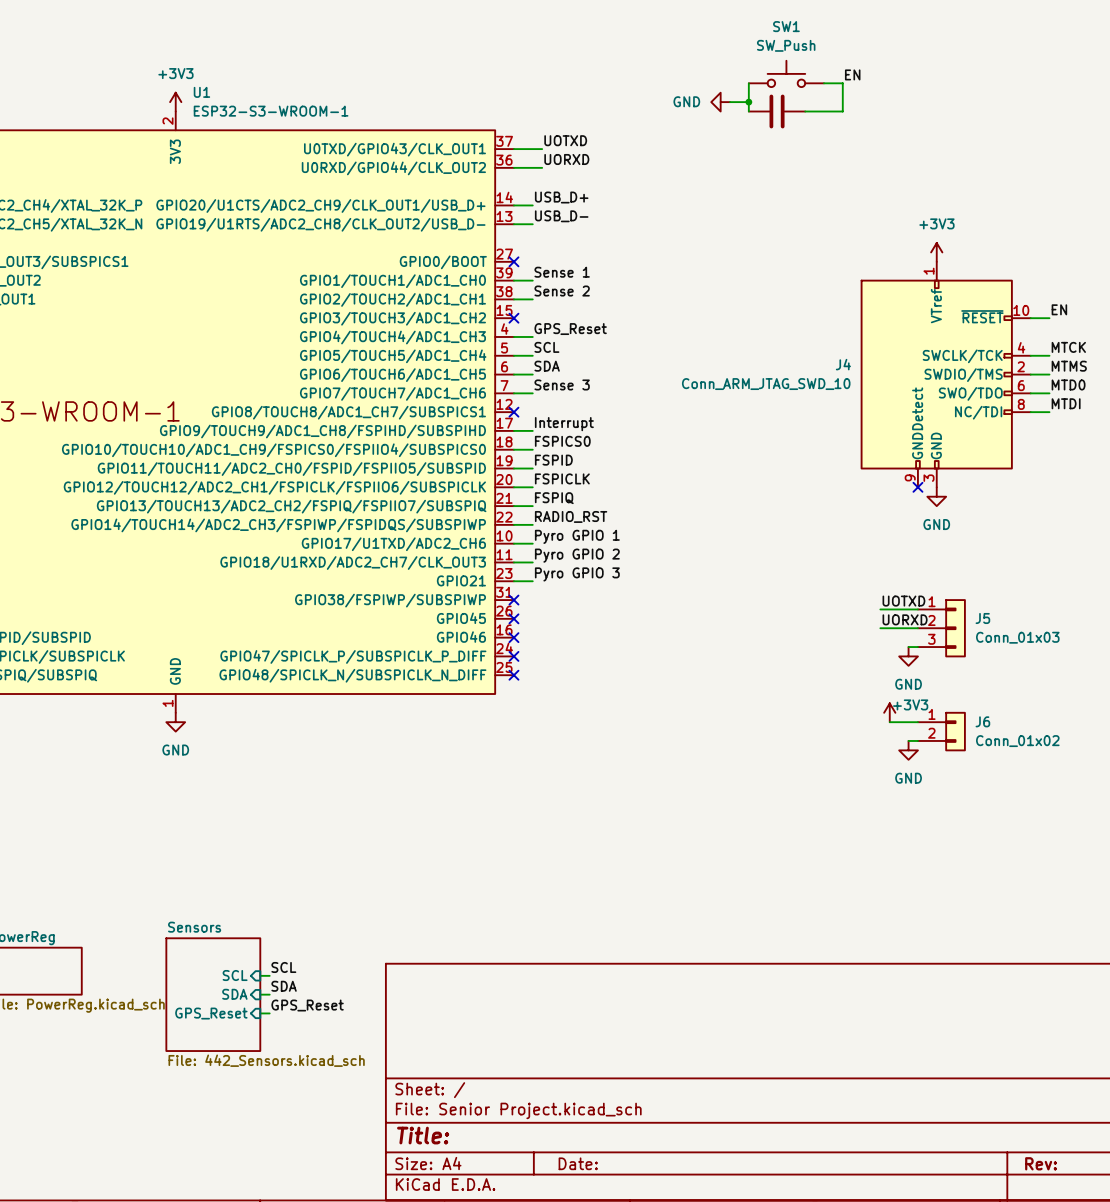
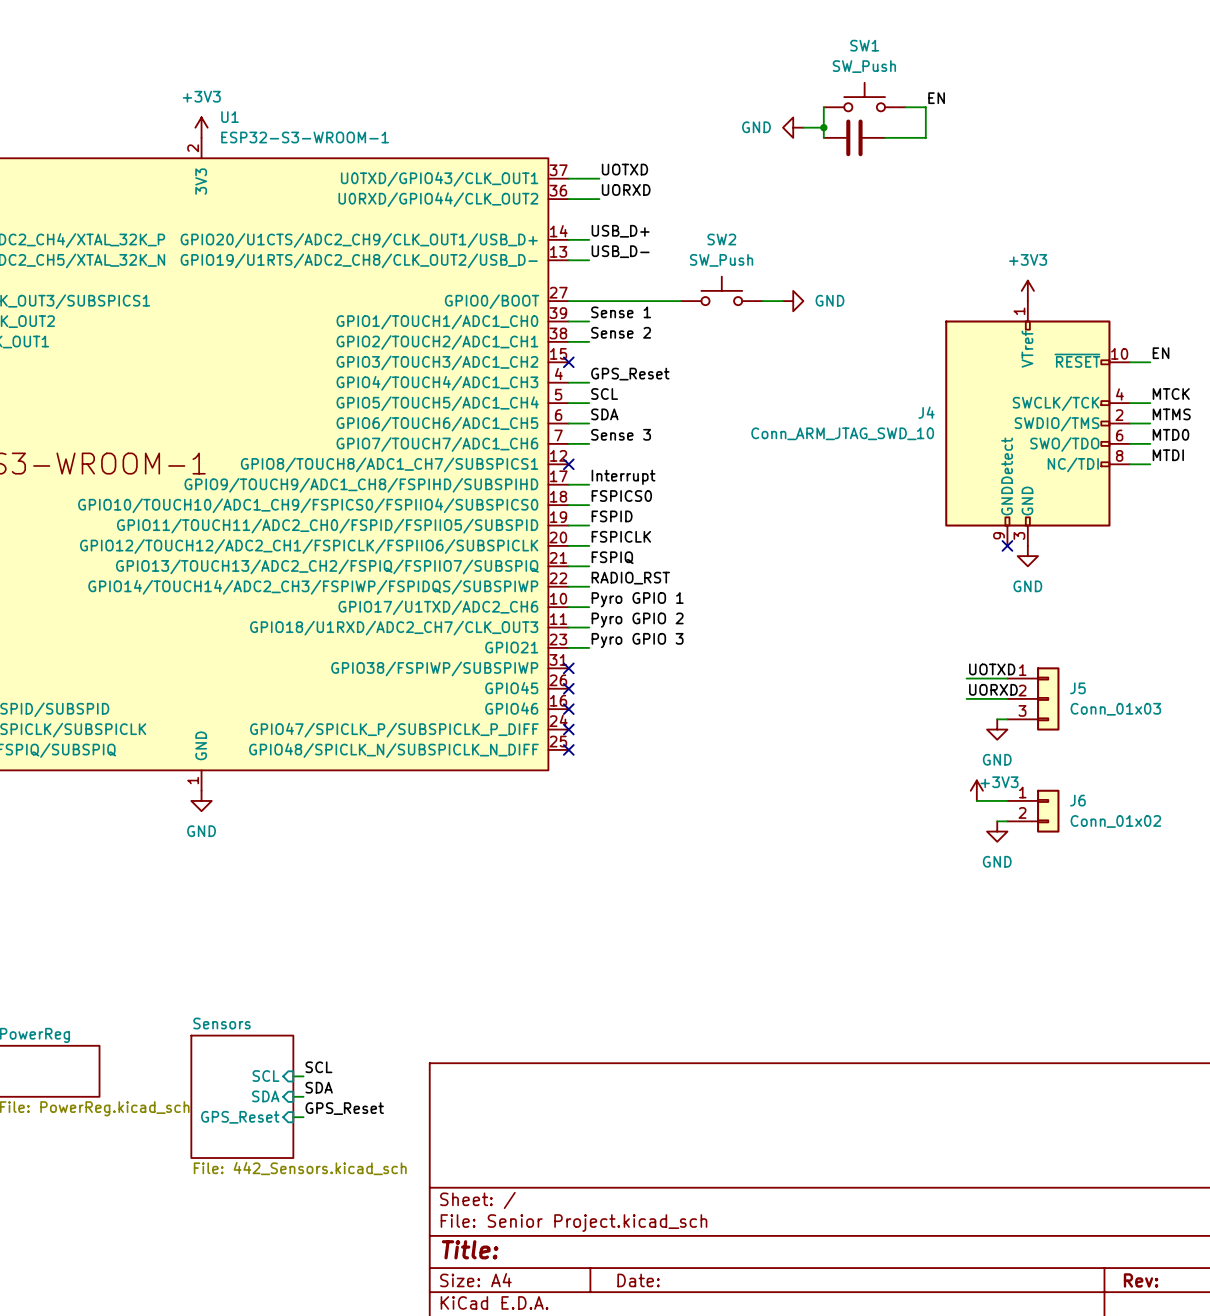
SW2: none -> SW_Push (721, 290)
wire: none -> (568, 301) (681, 301)
no-connect mark: (513, 261) -> none
wire: none -> (762, 301) (783, 301)
power symbol: none -> GND (793, 301)

